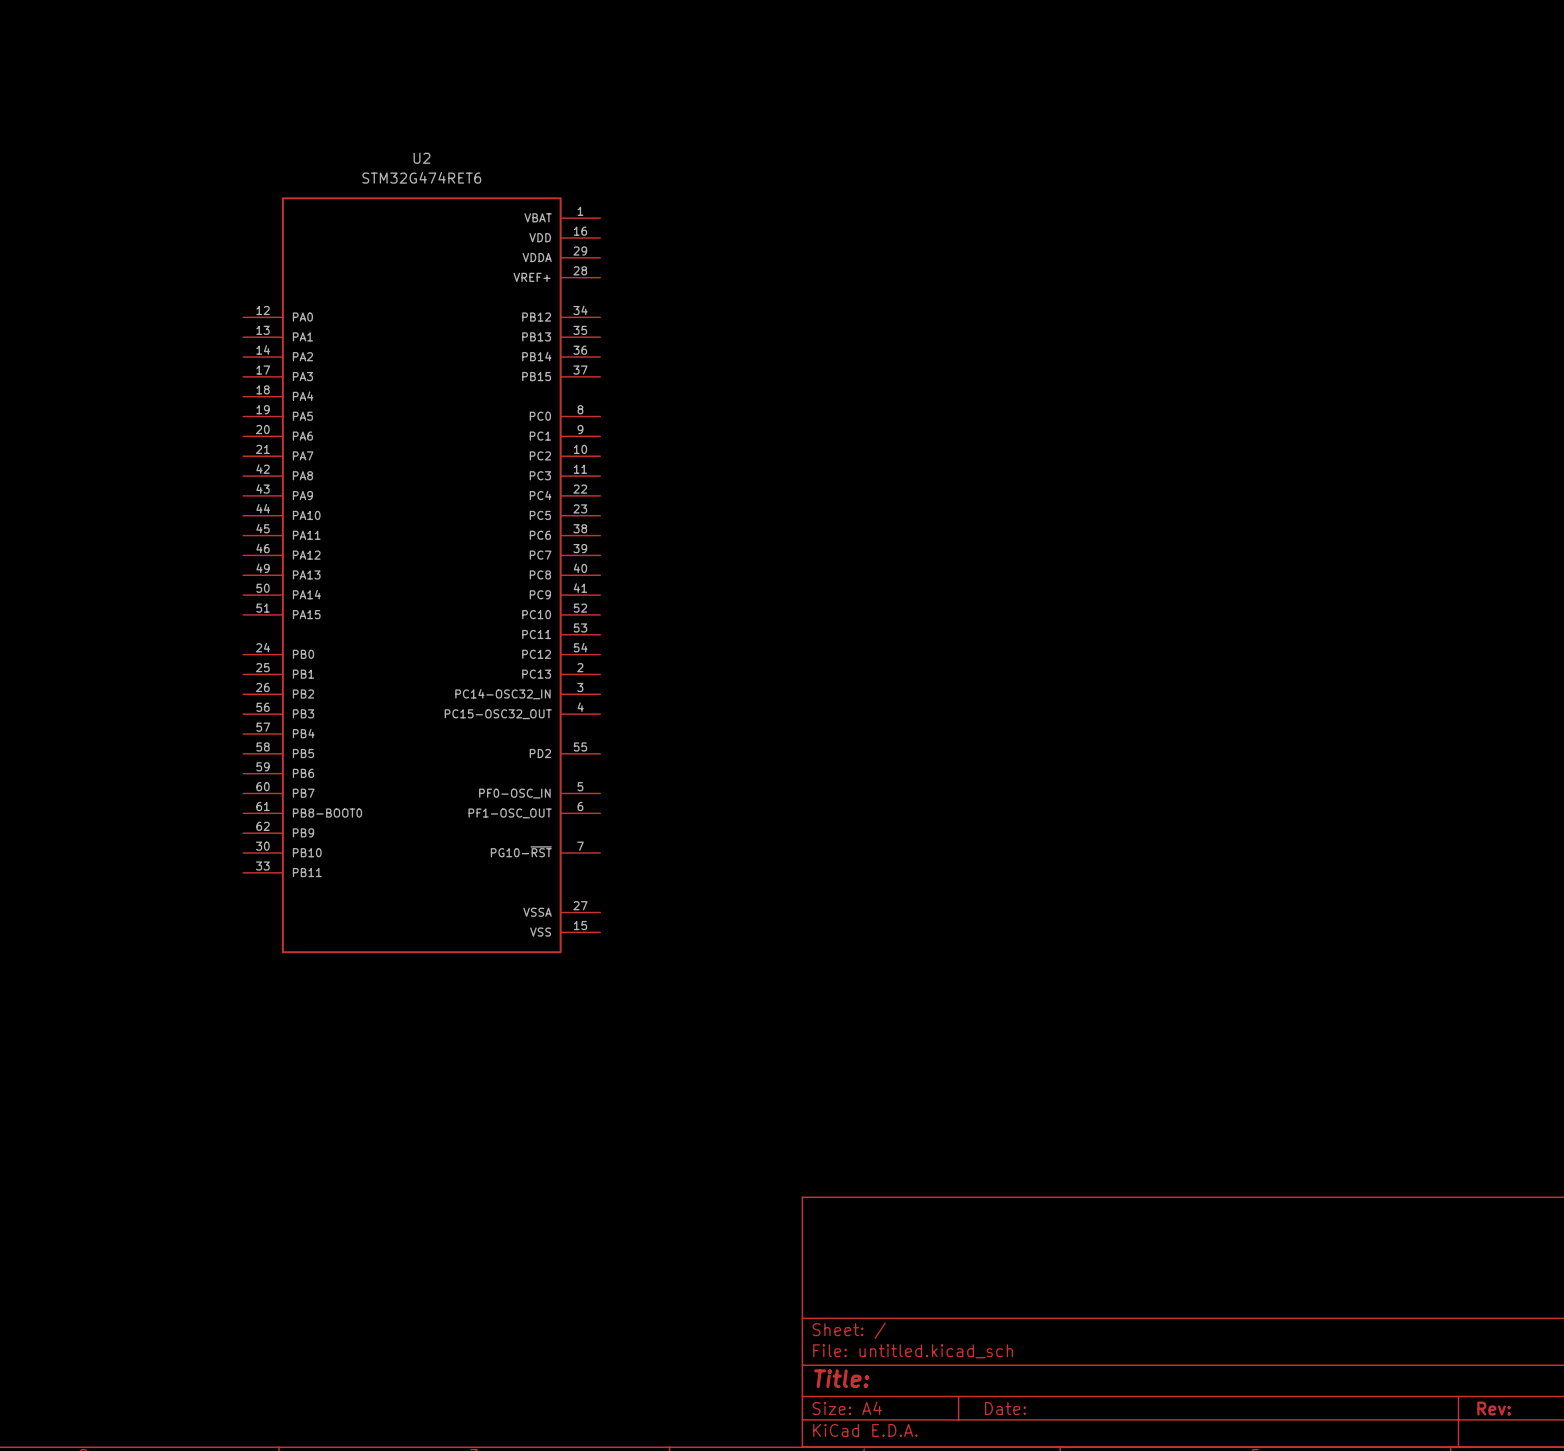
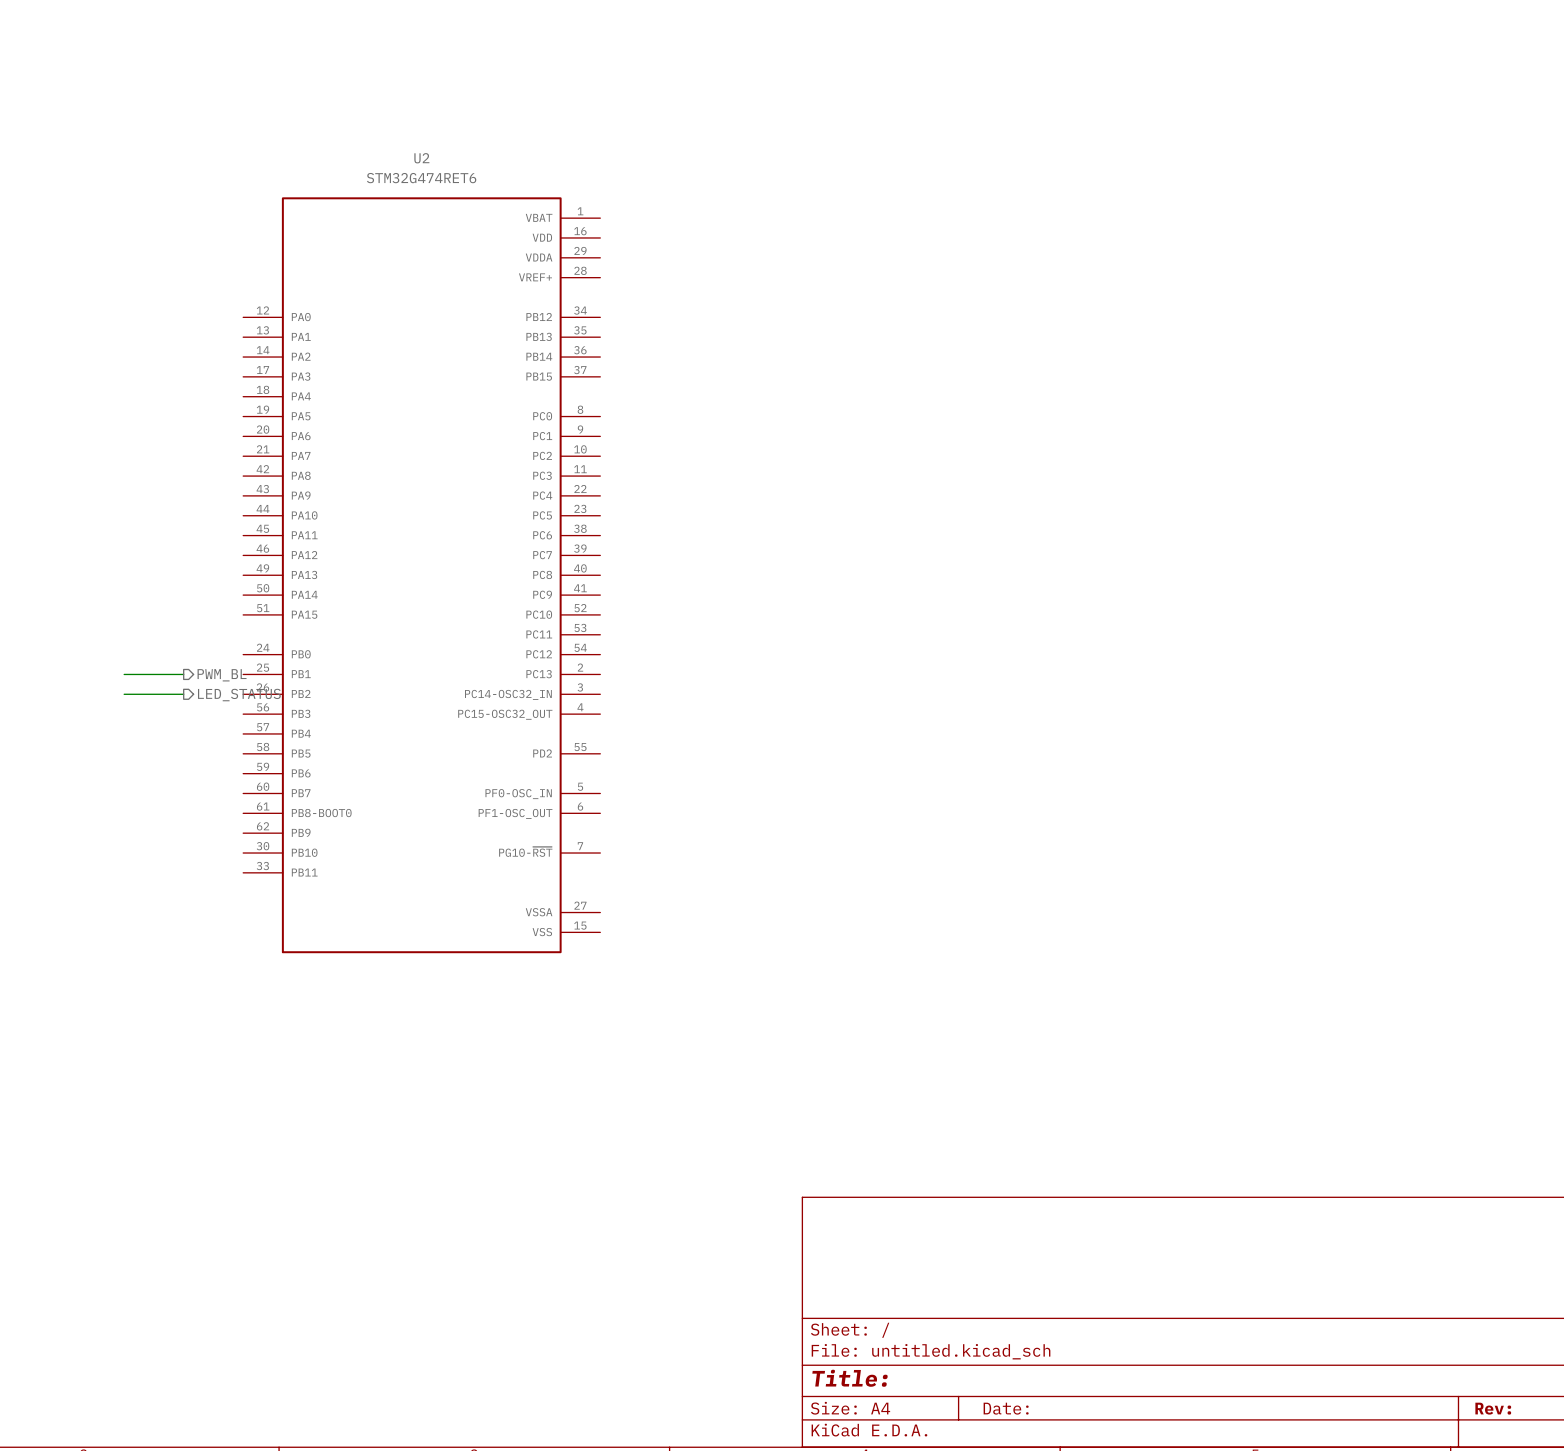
wire: none -> (124, 674) (183, 674)
hierarchical label: none -> PWM_BL (222, 675)
wire: none -> (124, 694) (183, 694)
hierarchical label: none -> LED_STATUS (239, 695)

